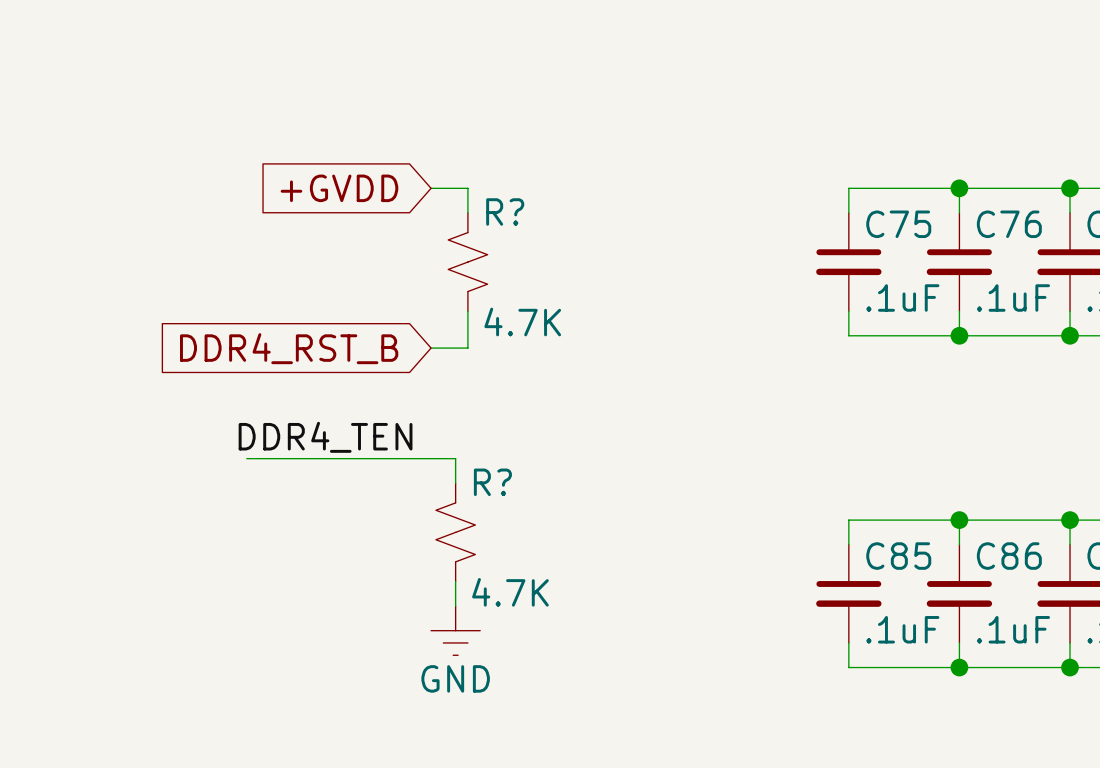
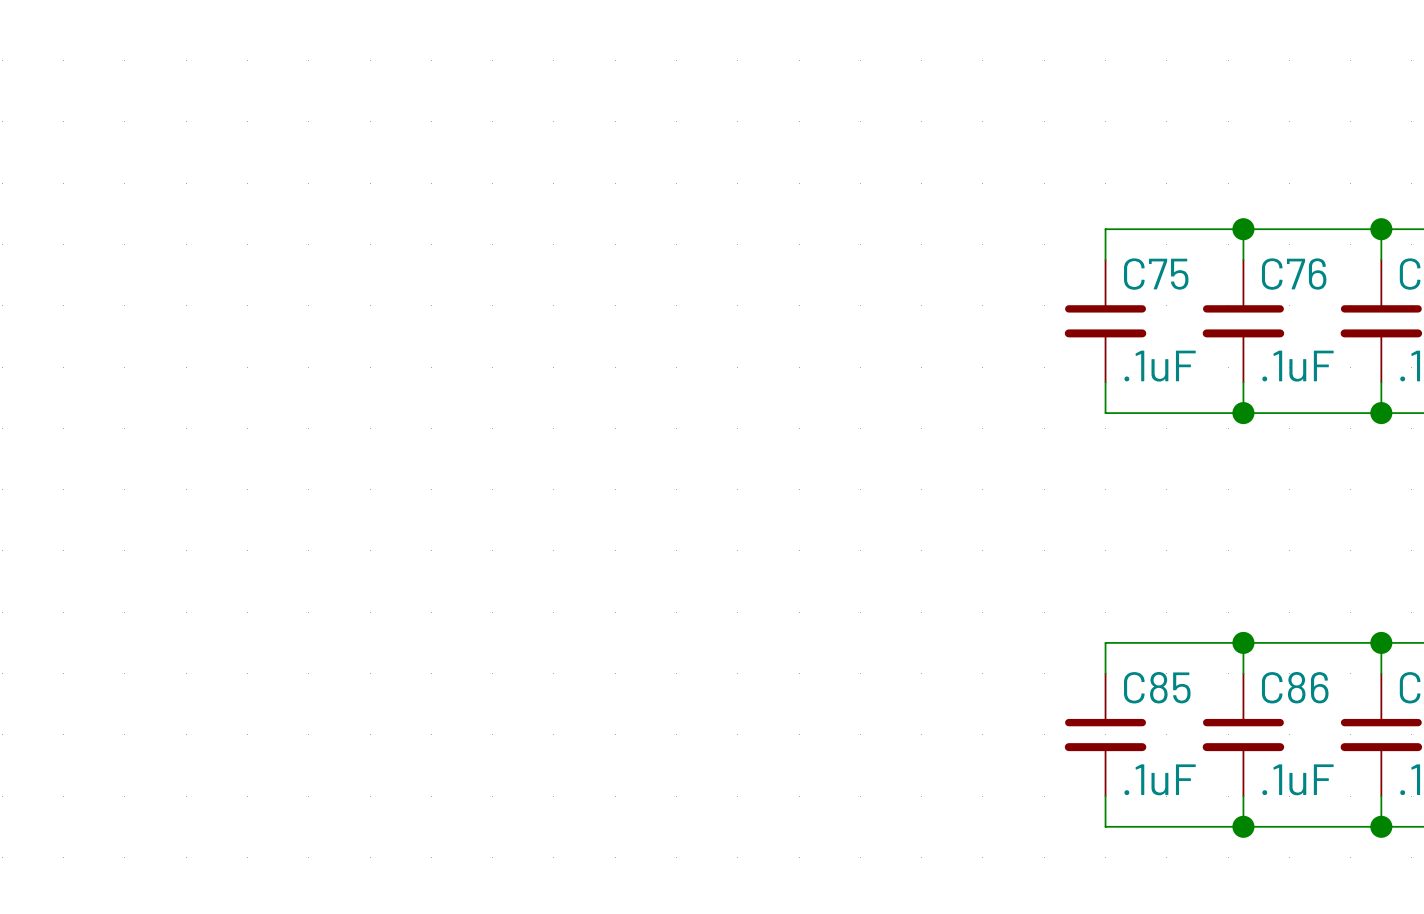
global label: +GVDD (339, 188) -> none
wire: (431, 188) (467, 188) (467, 212) -> none
R?: 4.7K (467, 262) -> none
wire: (467, 311) (467, 348) (431, 348) -> none
global label: DDR4_RST_B (289, 348) -> none
label: DDR4_TEN (325, 437) -> none
wire: (246, 458) (455, 458) (455, 483) -> none
R?: 4.7K (455, 532) -> none
wire: (455, 581) (455, 606) -> none
power symbol: GND (455, 630) -> none

